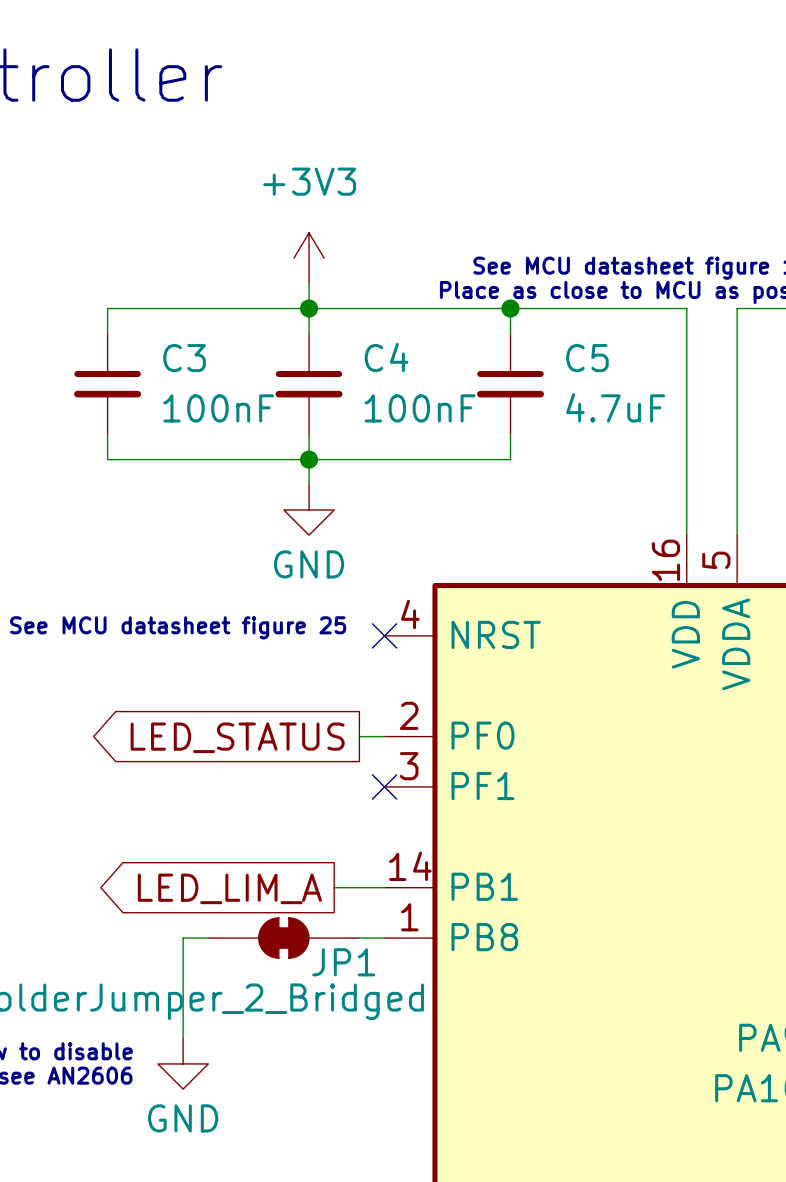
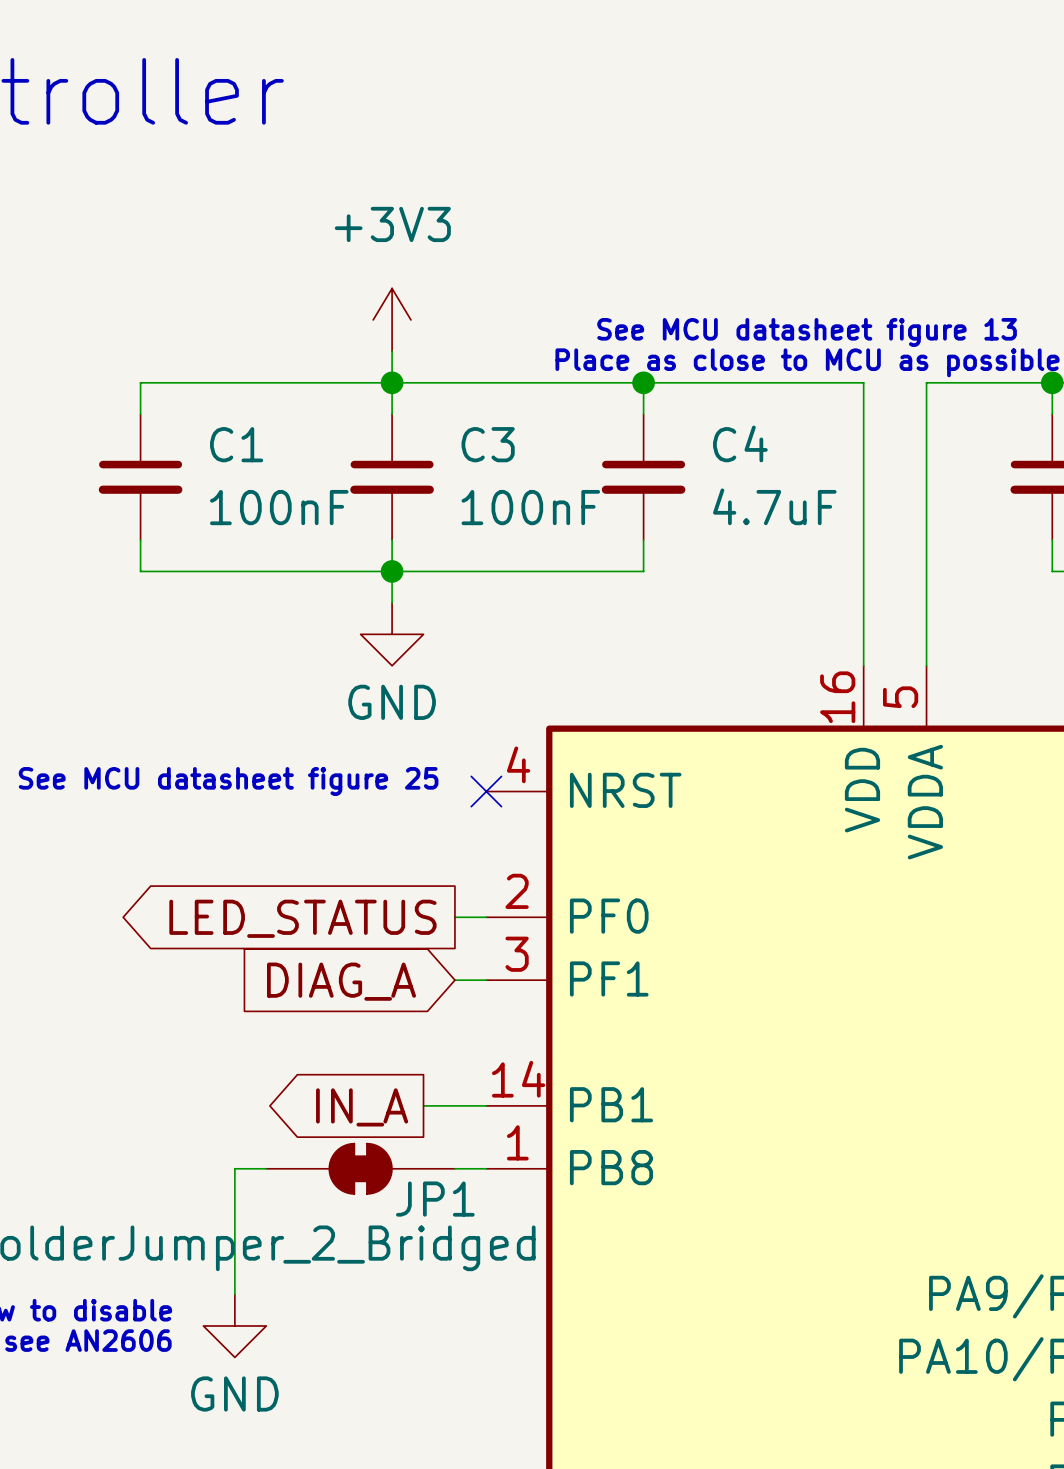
C4 name: C4 (386, 357) -> C3 (488, 444)
C3 name: C3 (184, 358) -> C1 (236, 444)
C5 name: C5 (587, 358) -> C4 (740, 443)
wire: none -> (454, 980) (486, 980)
no-connect mark: (384, 786) -> none
global label: none -> DIAG_A (341, 981)
global label: LED_LIM_A (229, 888) -> IN_A (362, 1107)

